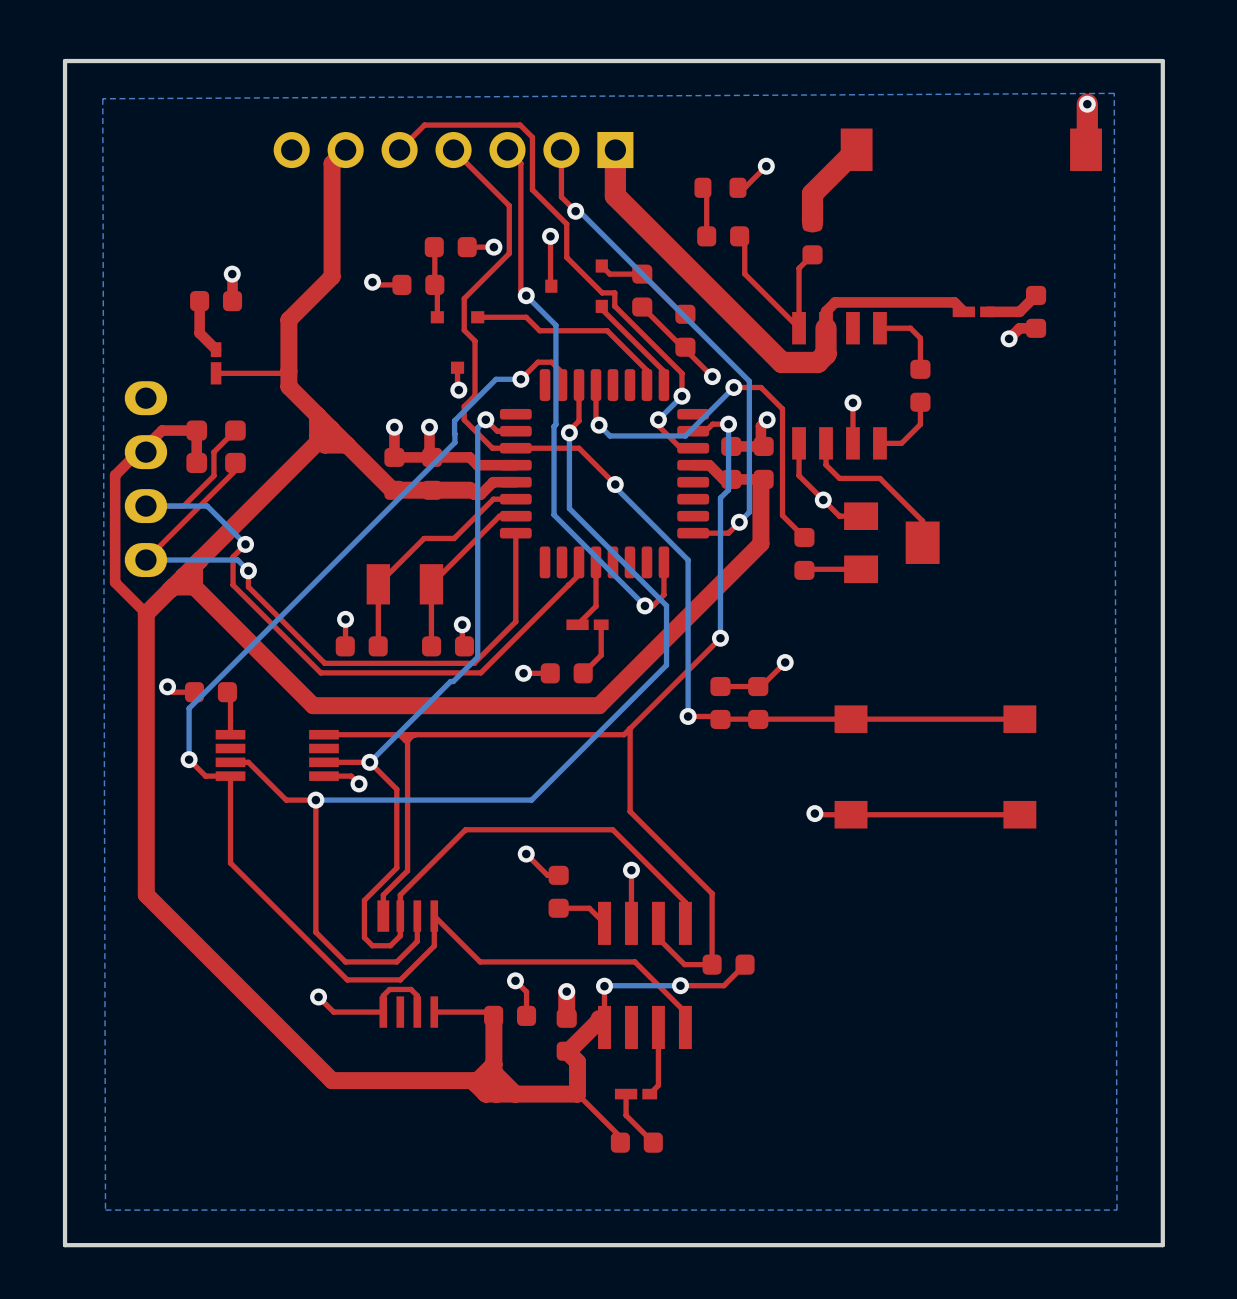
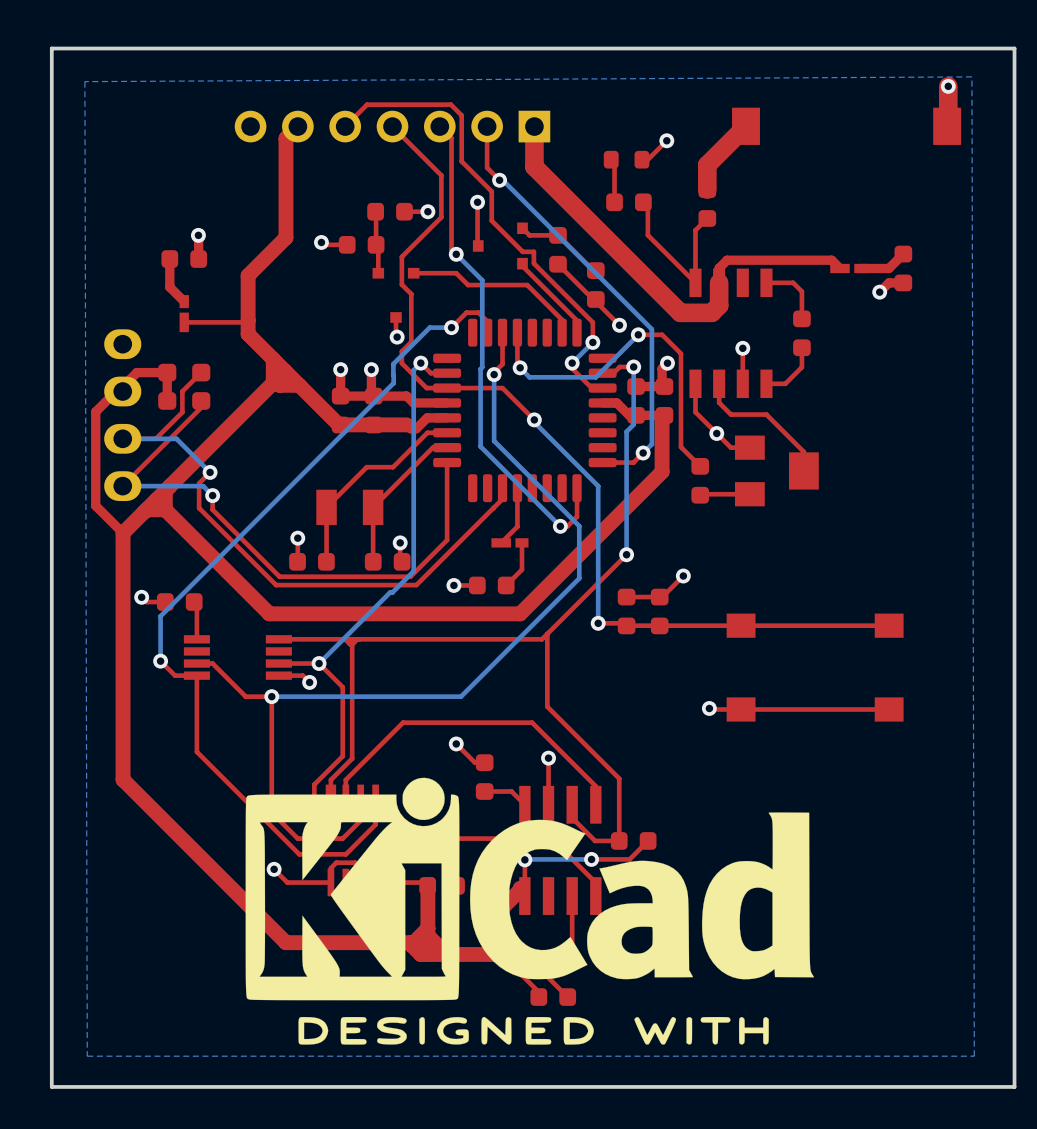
drawing: none -> [245, 777, 815, 1045]

